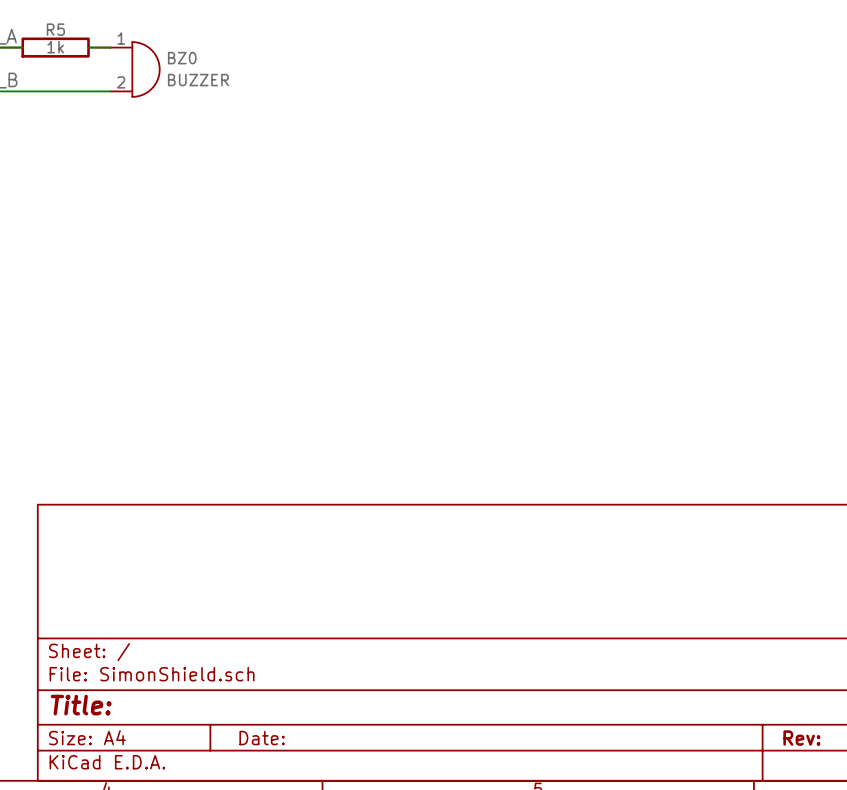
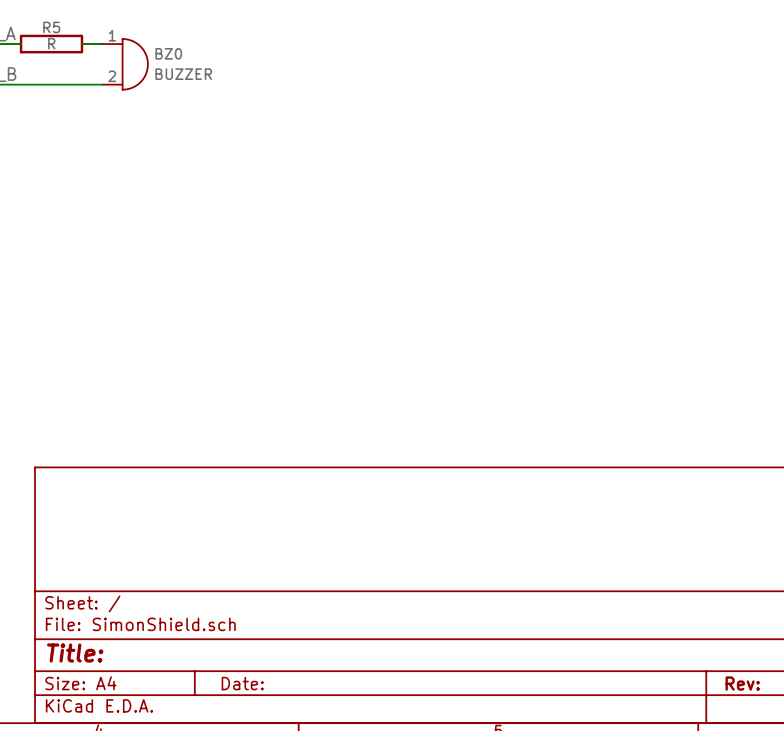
R5 value: 1k (55, 47) -> R (51, 43)

